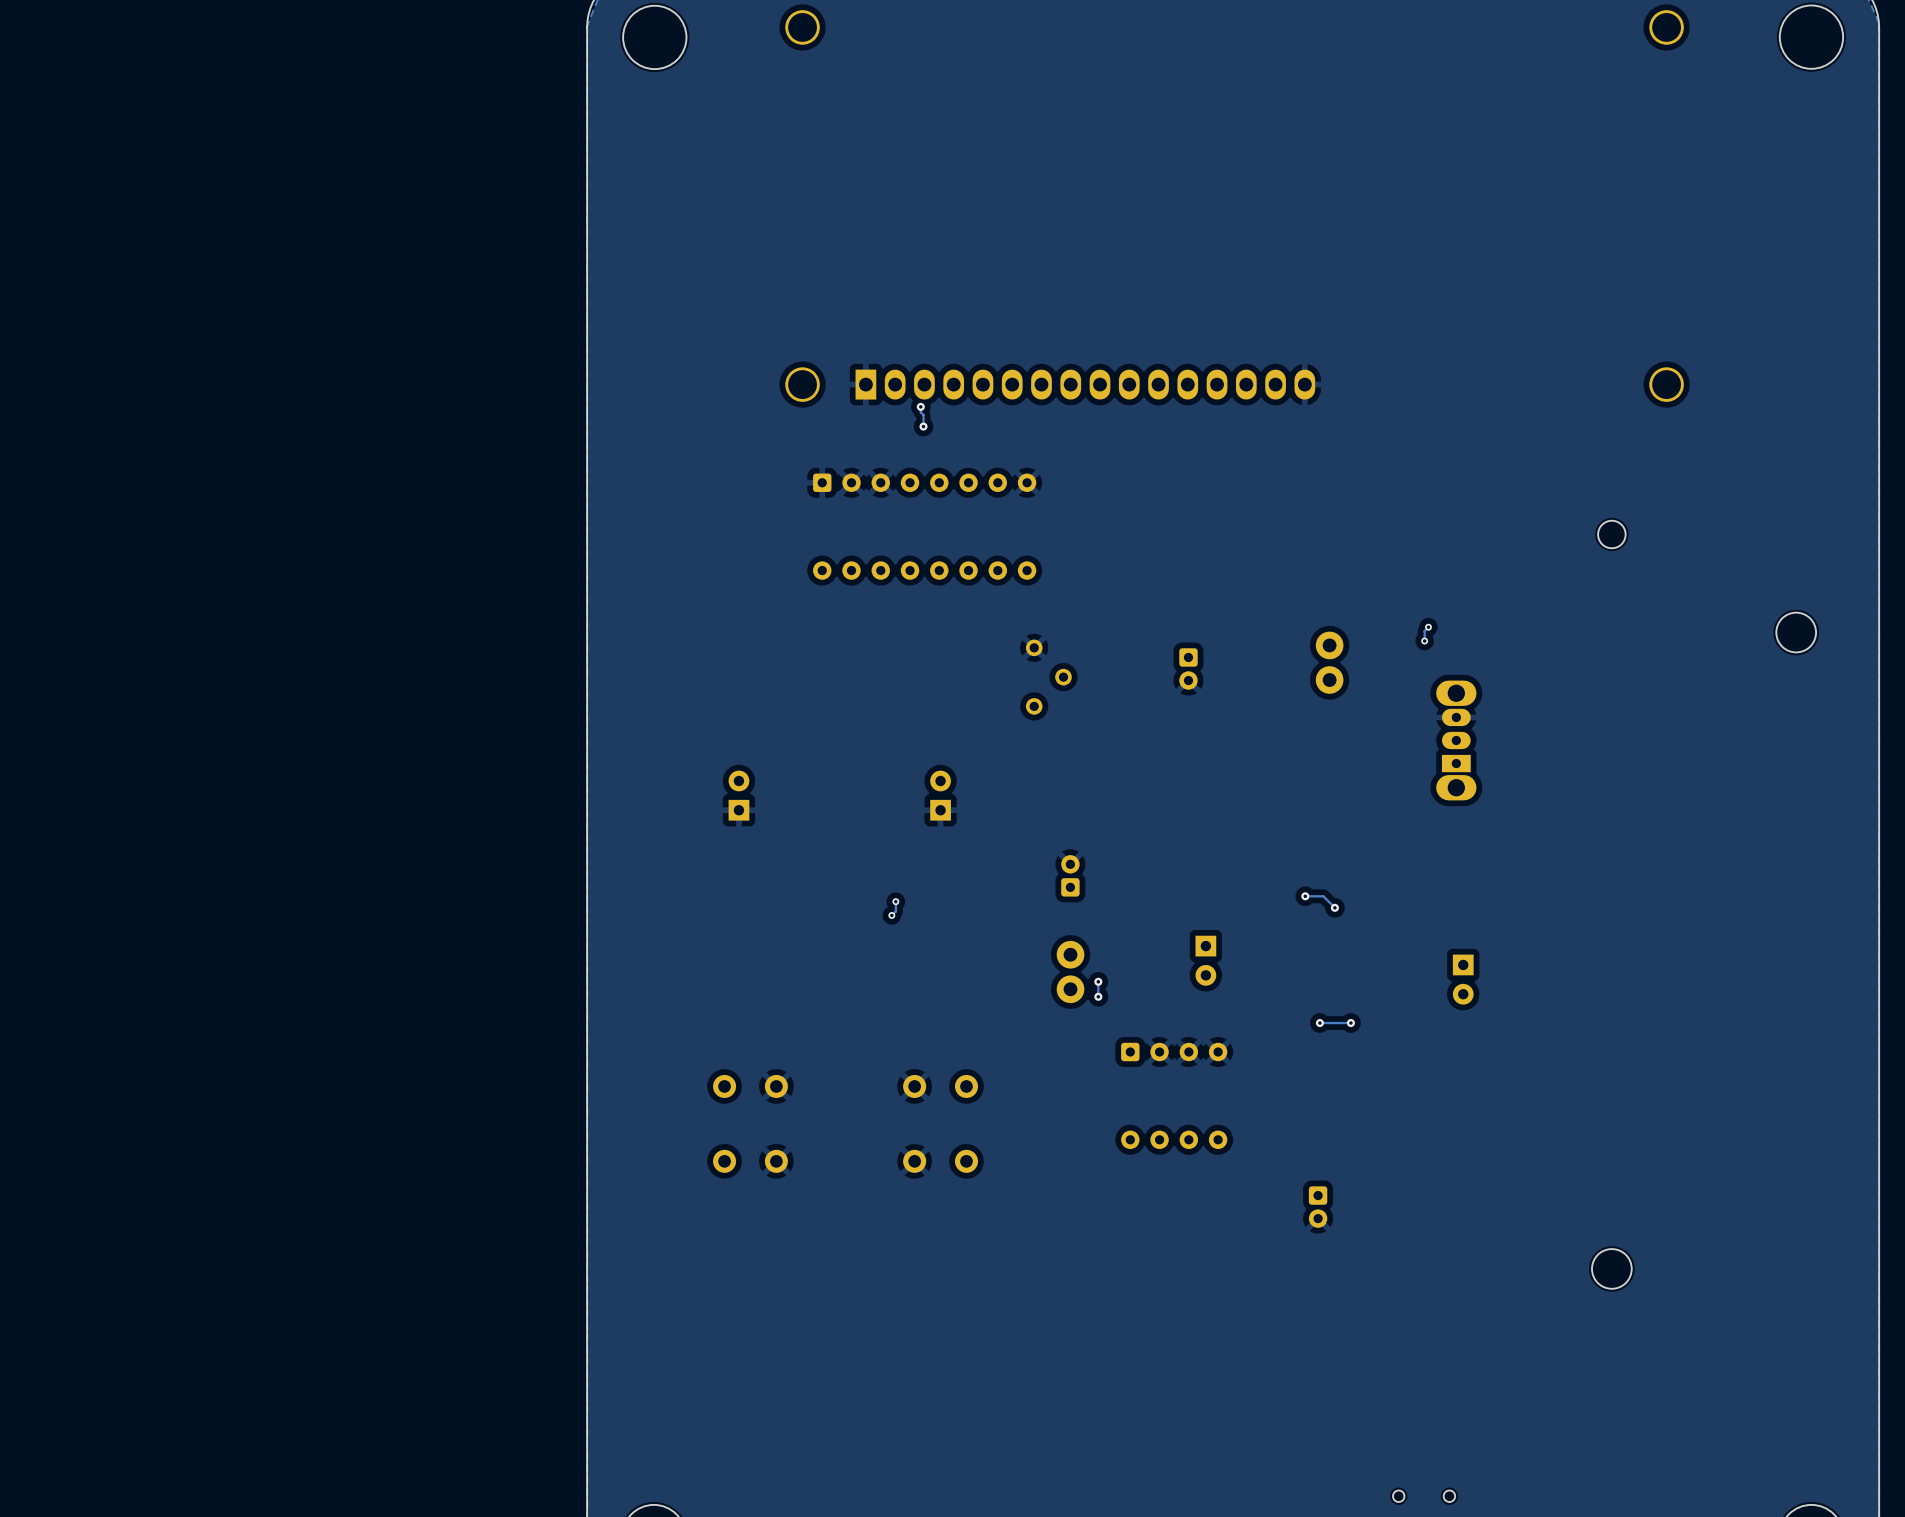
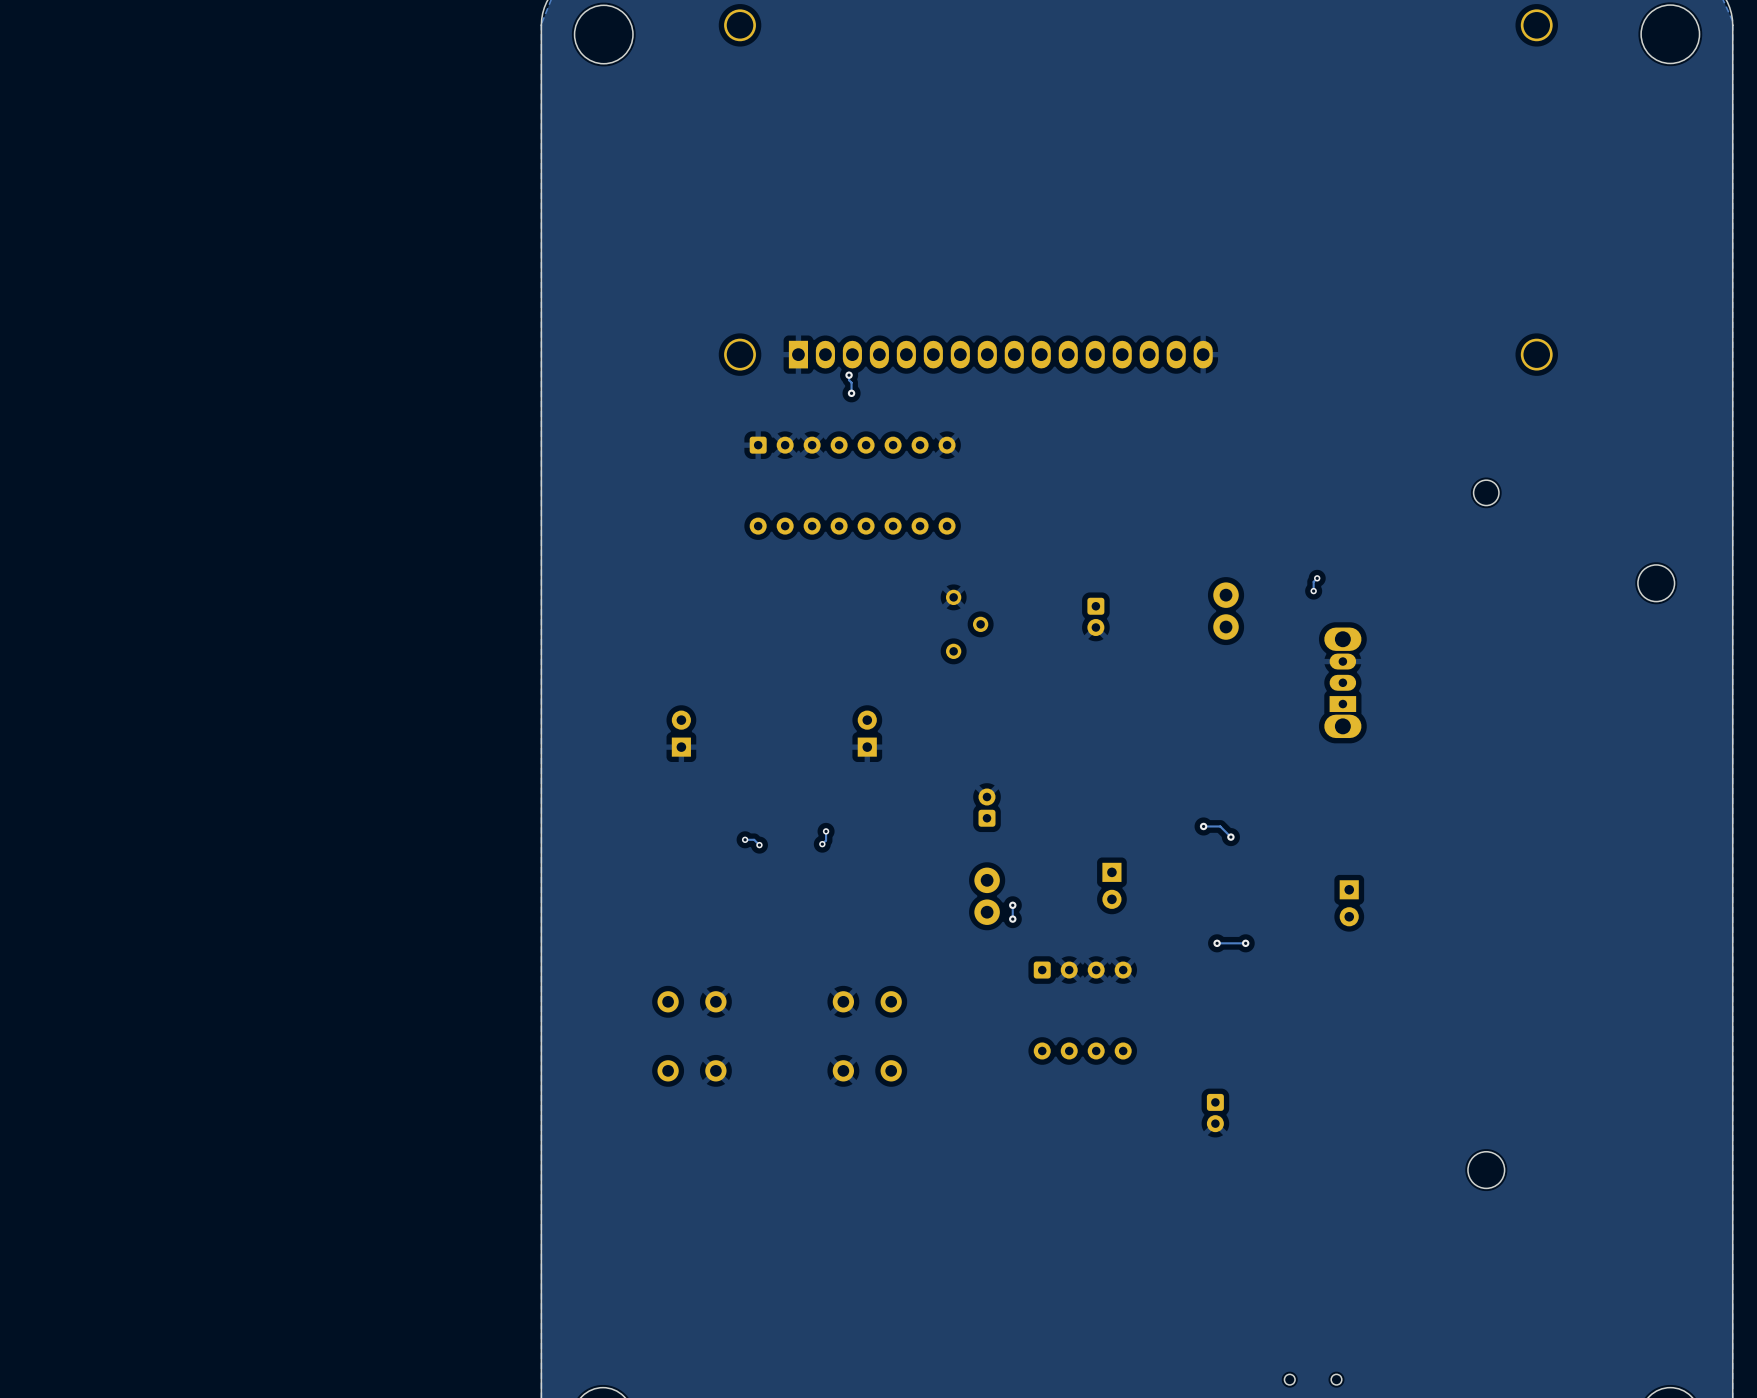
track: none -> (745, 839) (754, 839) (759, 845)
via: none -> (745, 839)
via: none -> (759, 845)

